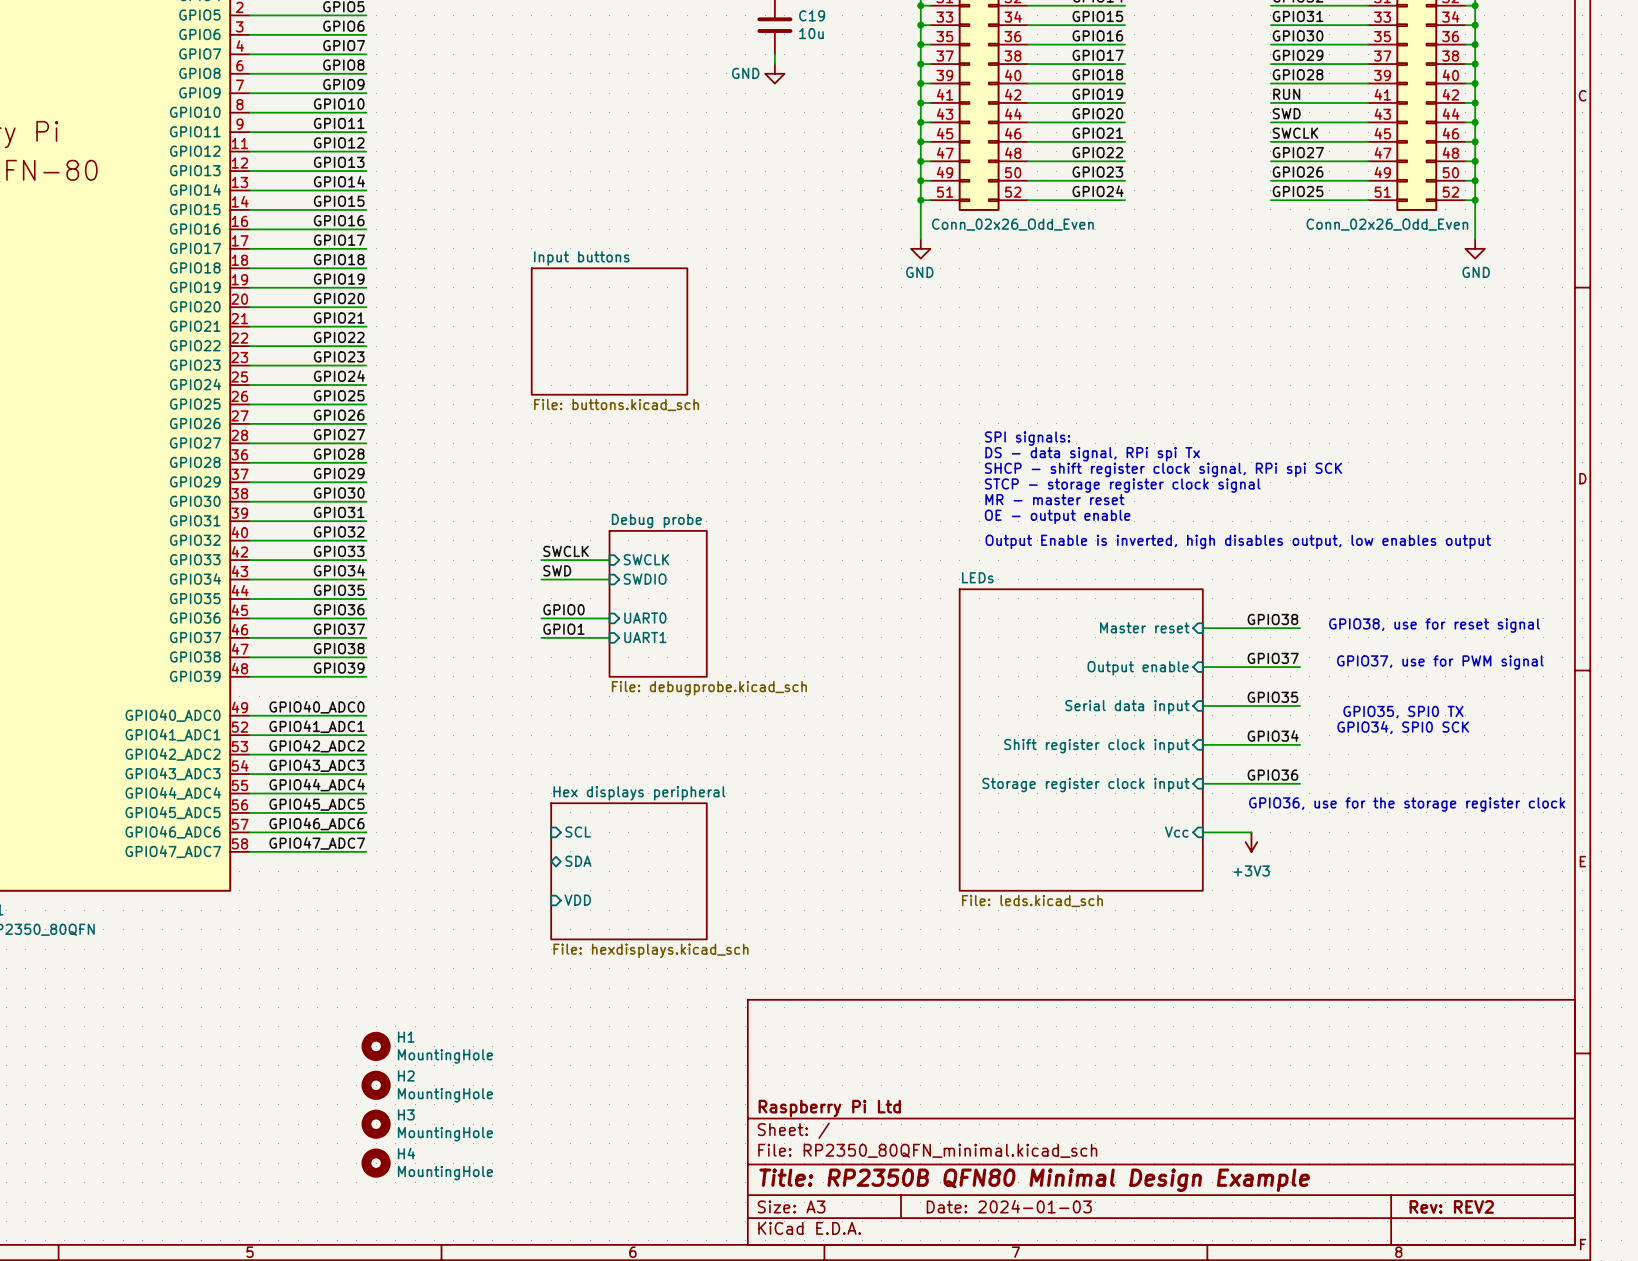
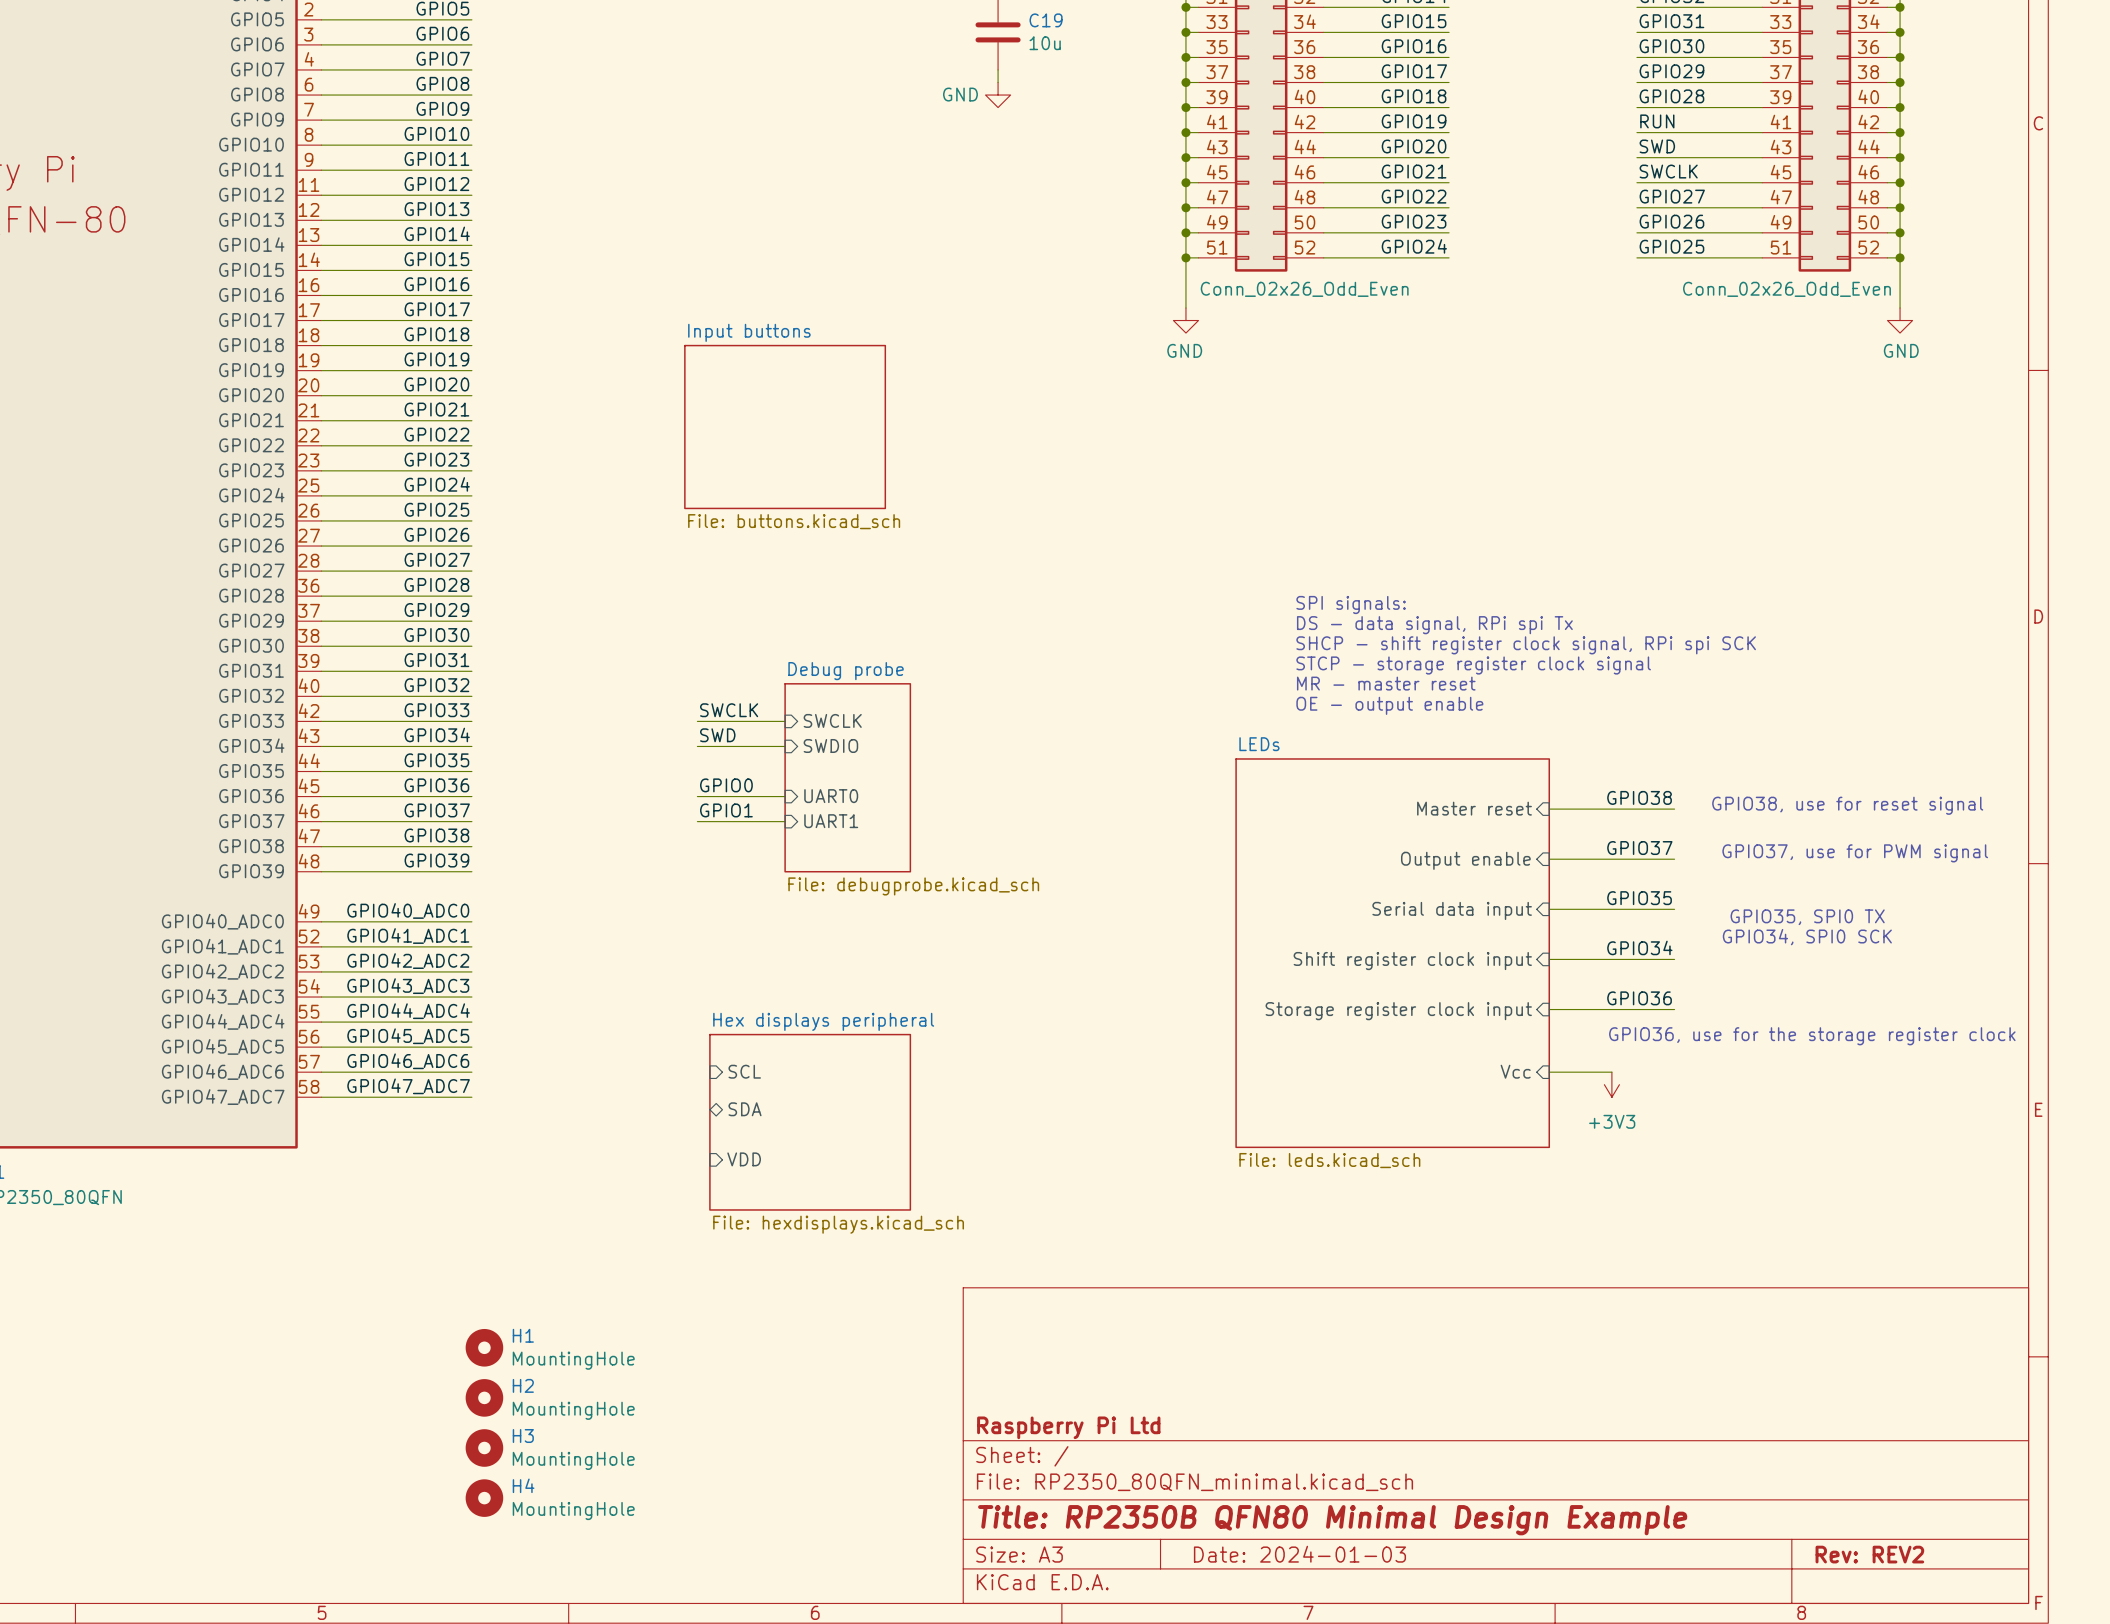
text position: SPI signals: (1027, 438) -> SPI signals: (1351, 604)
text position: DS - data signal, RPi spi Tx (1092, 454) -> DS - data signal, RPi spi Tx (1434, 625)
text position: SHCP - shift register clock signal, RPi spi SCK (1163, 469) -> SHCP - shift register clock signal, RPi spi SCK (1526, 645)
text position: STCP - storage register clock signal (1122, 485) -> STCP - storage register clock signal (1473, 665)
text position: MR - master reset (1054, 499) -> MR - master reset (1386, 683)
text position: OE - output enable (1057, 516) -> OE - output enable (1389, 705)
text: Output Enable is inverted, high disables output, low enables output (1238, 541) -> none

